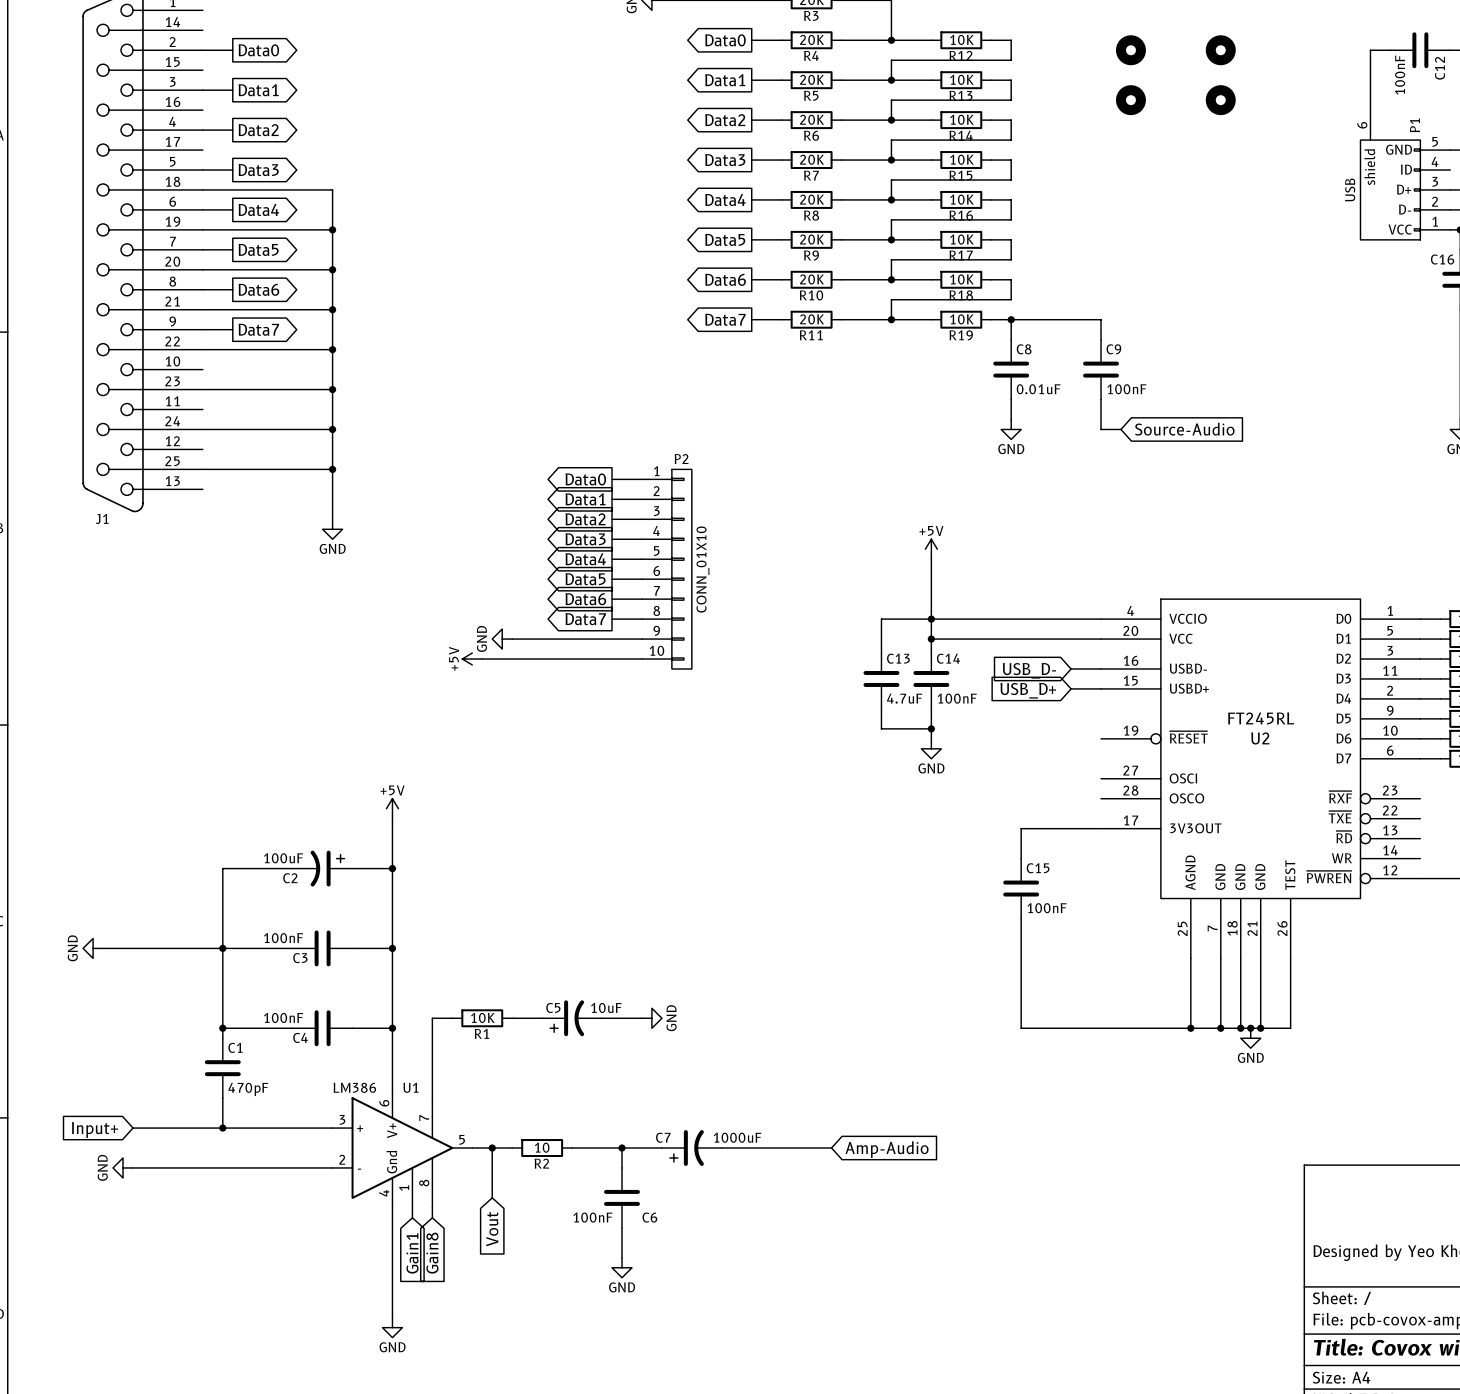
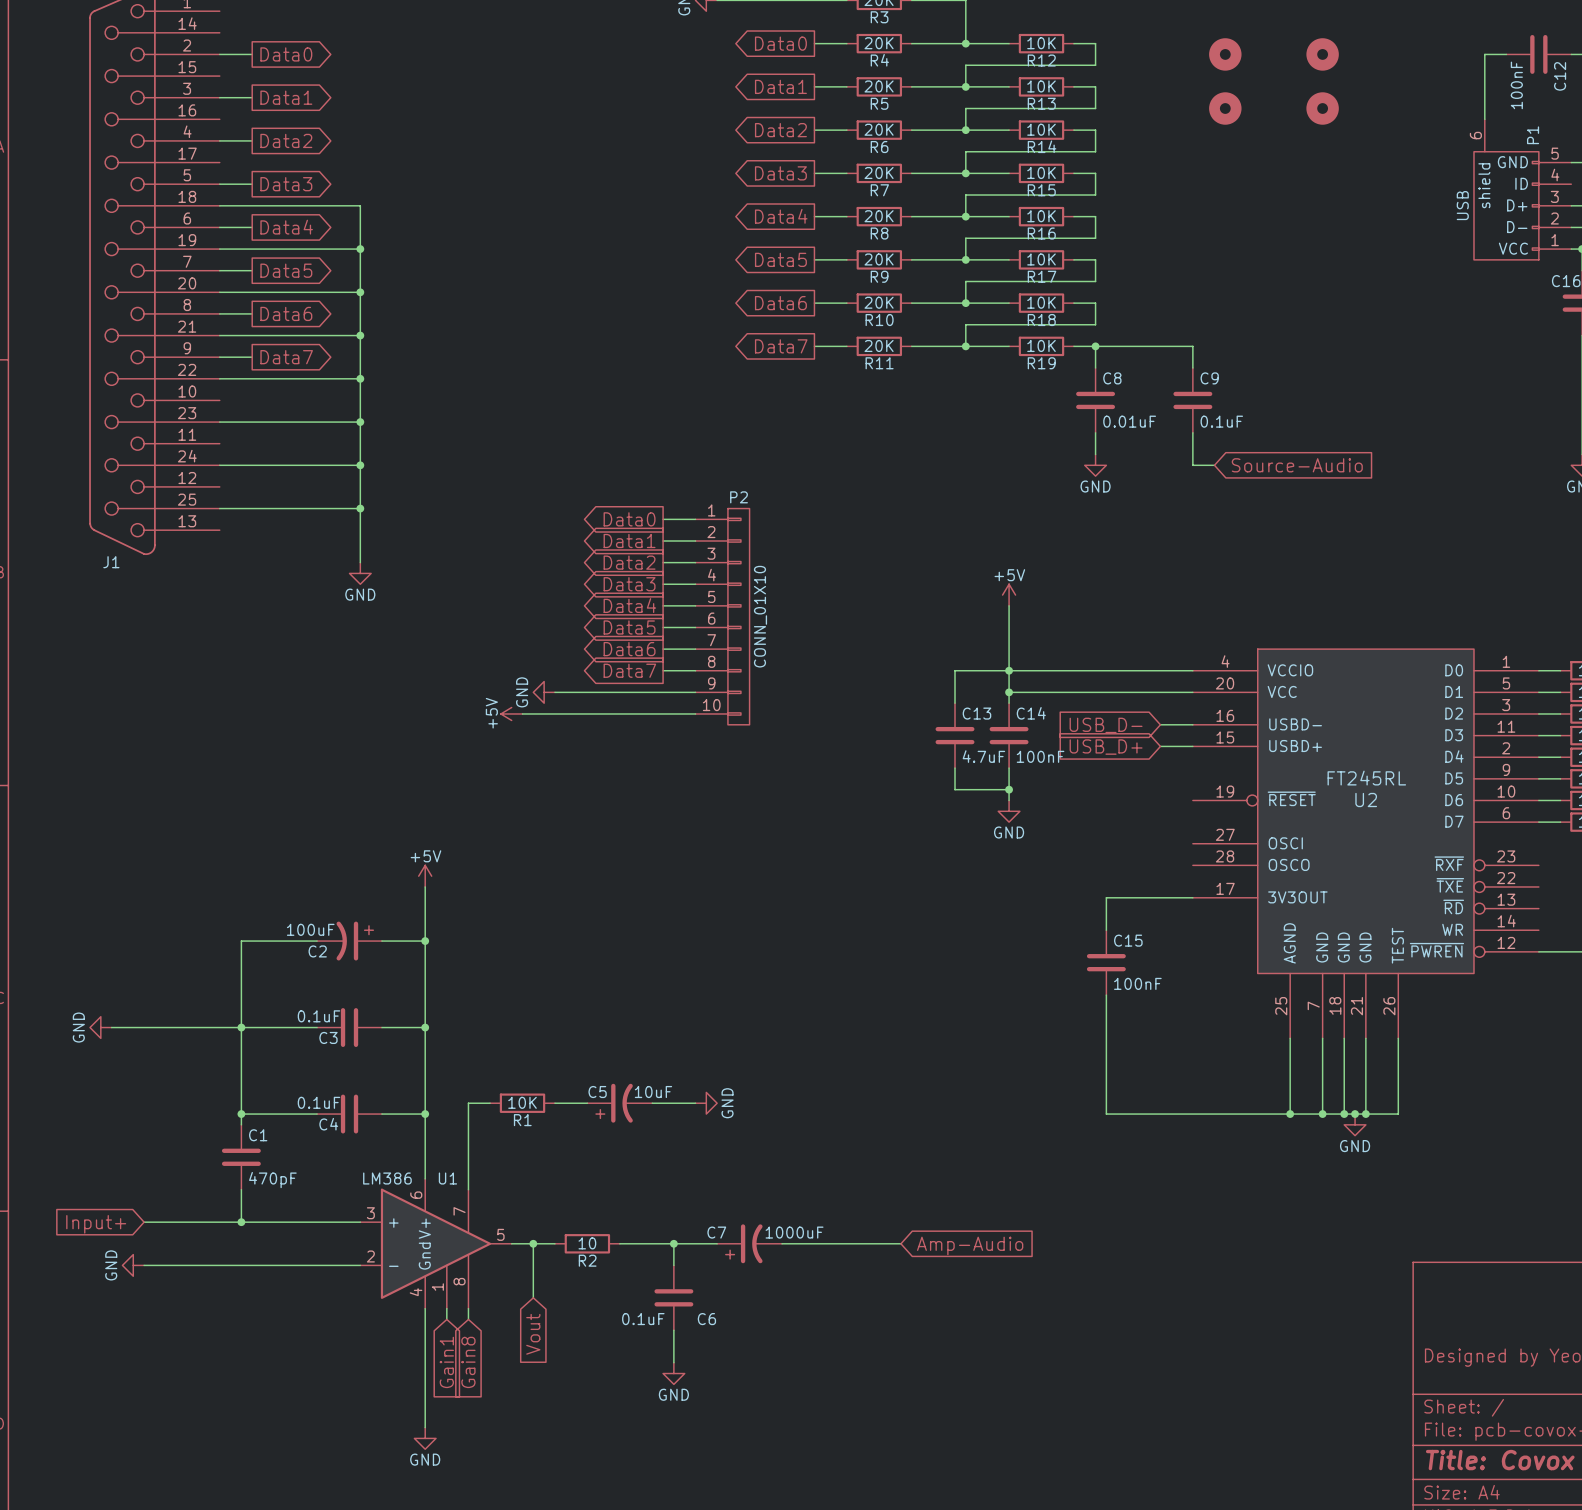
C9 value: 100nF (1126, 389) -> 0.1uF (1221, 421)
C3 value: 100nF (283, 938) -> 0.1uF (318, 1016)
C4 value: 100nF (283, 1017) -> 0.1uF (318, 1102)
C6 value: 100nF (592, 1217) -> 0.1uF (643, 1319)

